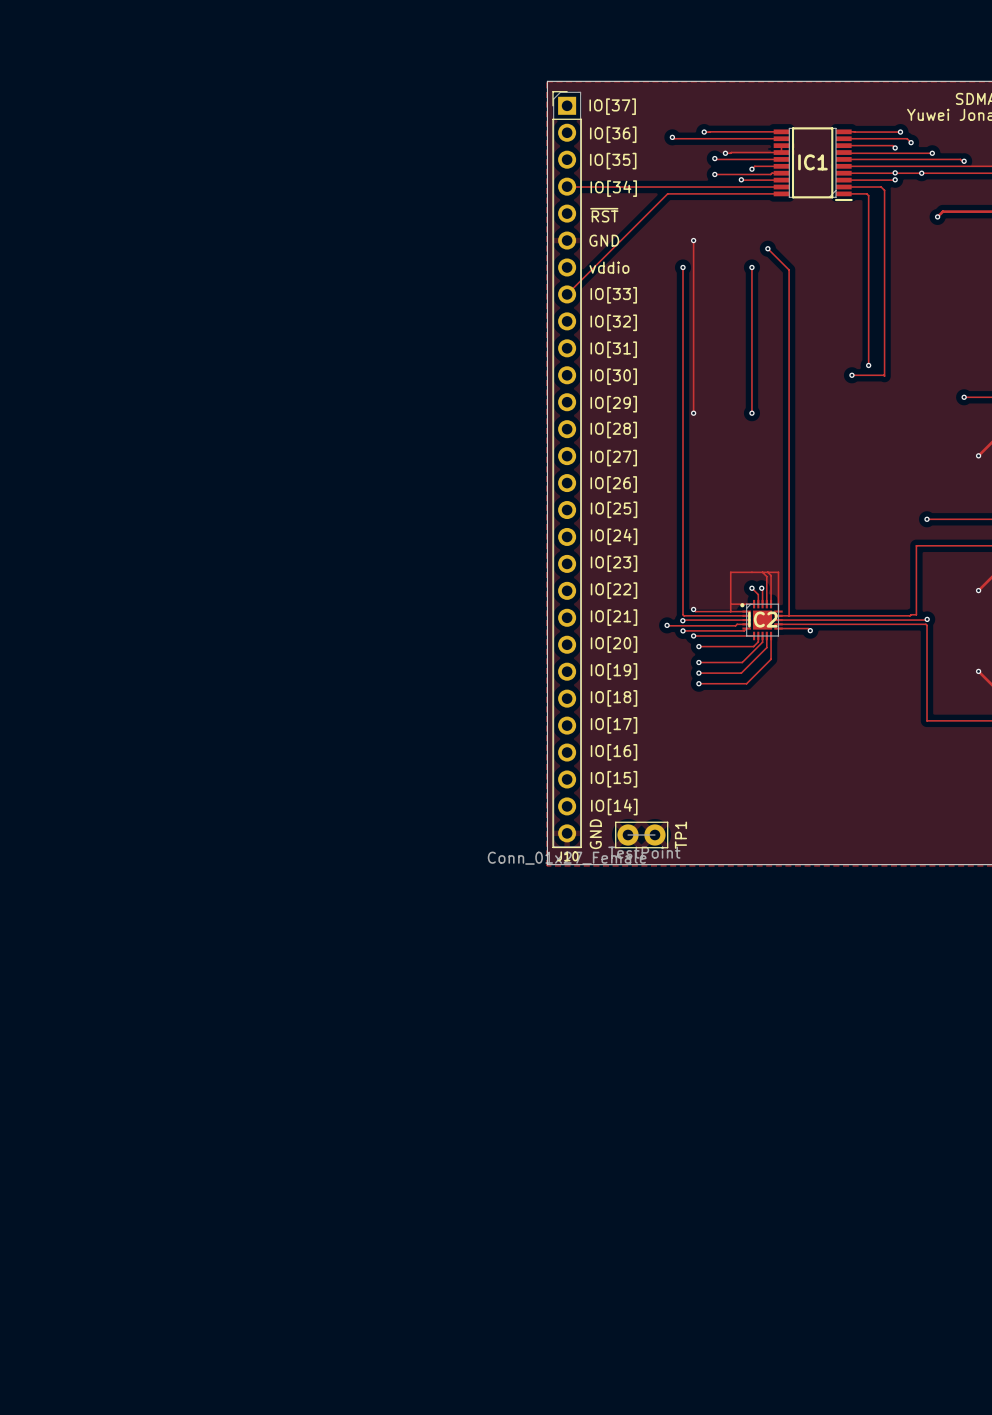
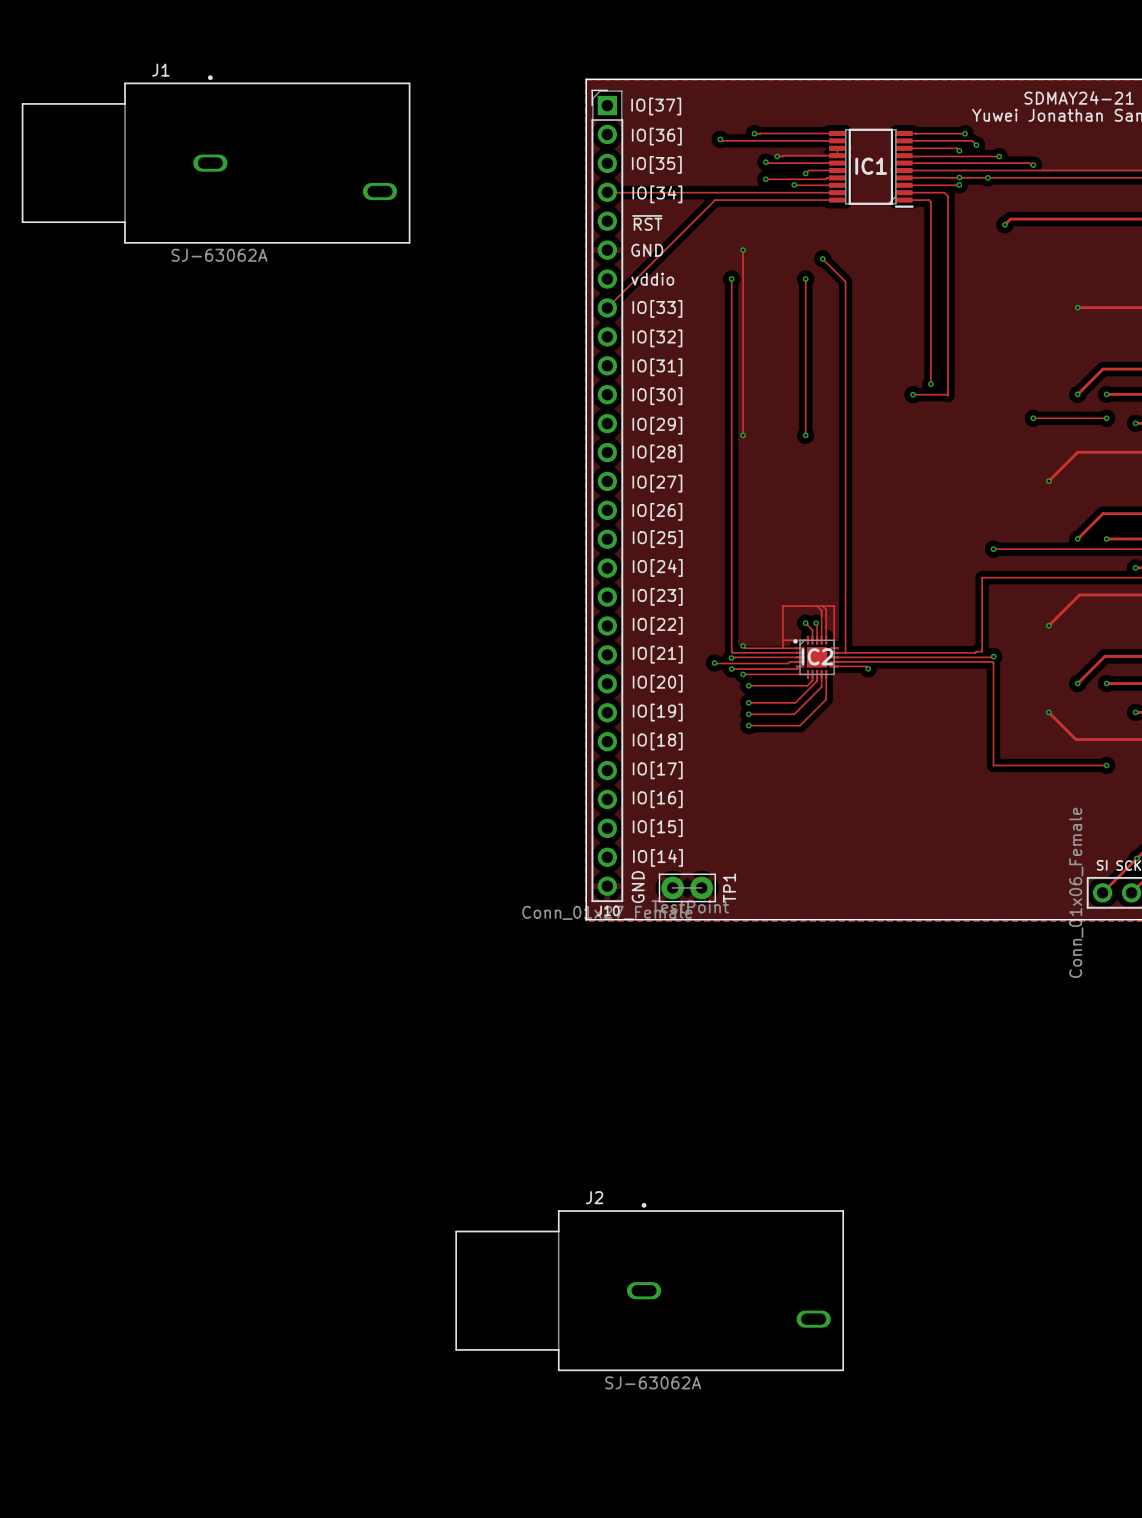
J1: none -> SJ-63062A (216, 159)
J2: none -> SJ-63062A (649, 1287)

